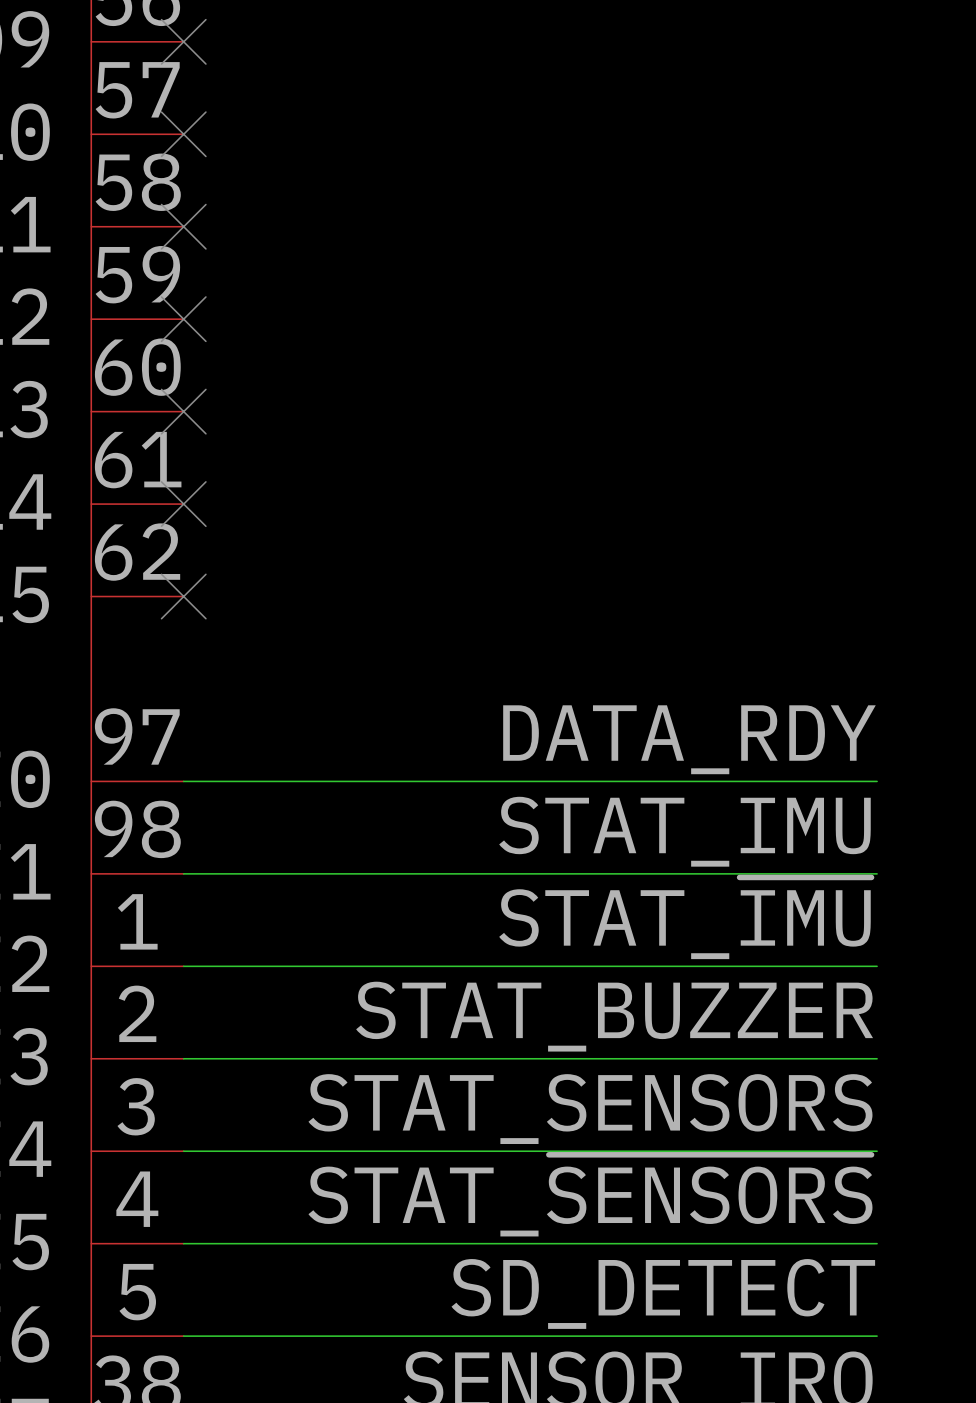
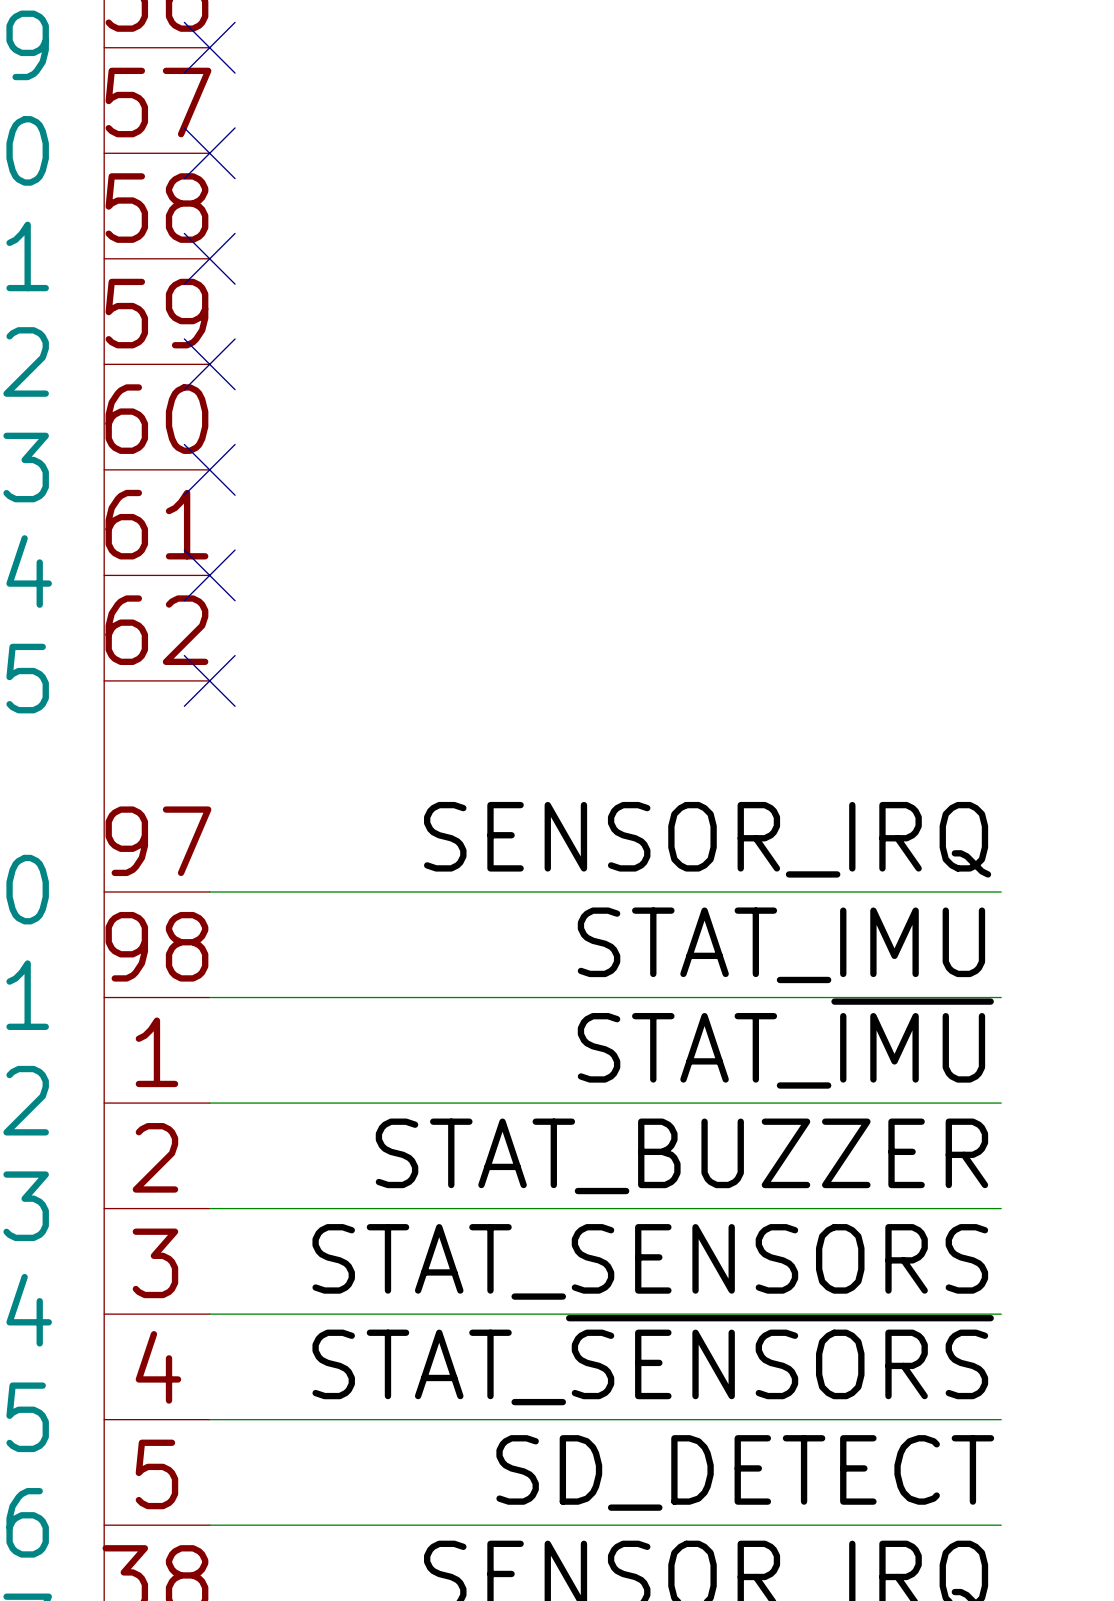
label: DATA_RDY (689, 739) -> SENSOR_IRQ (707, 839)

